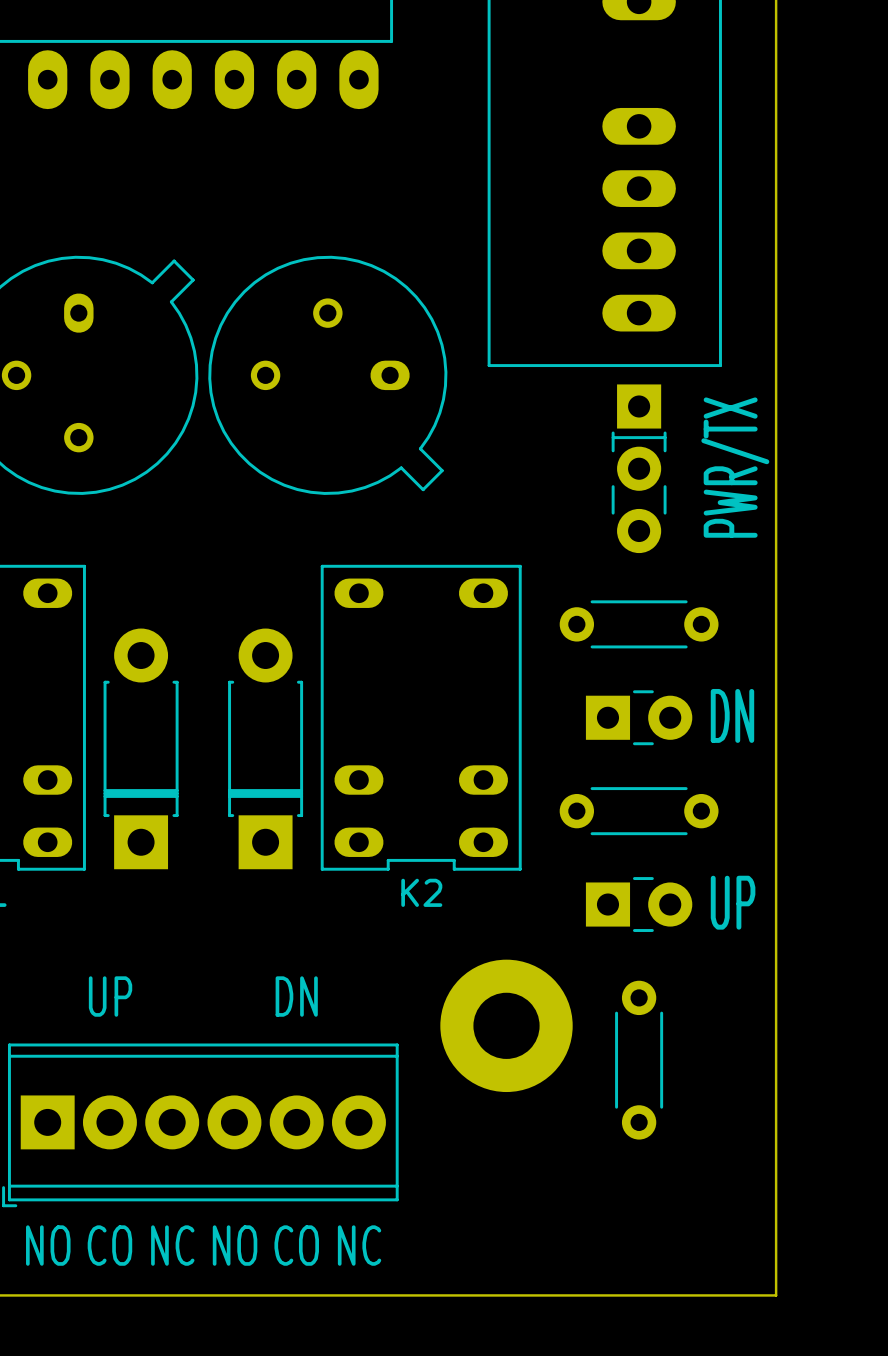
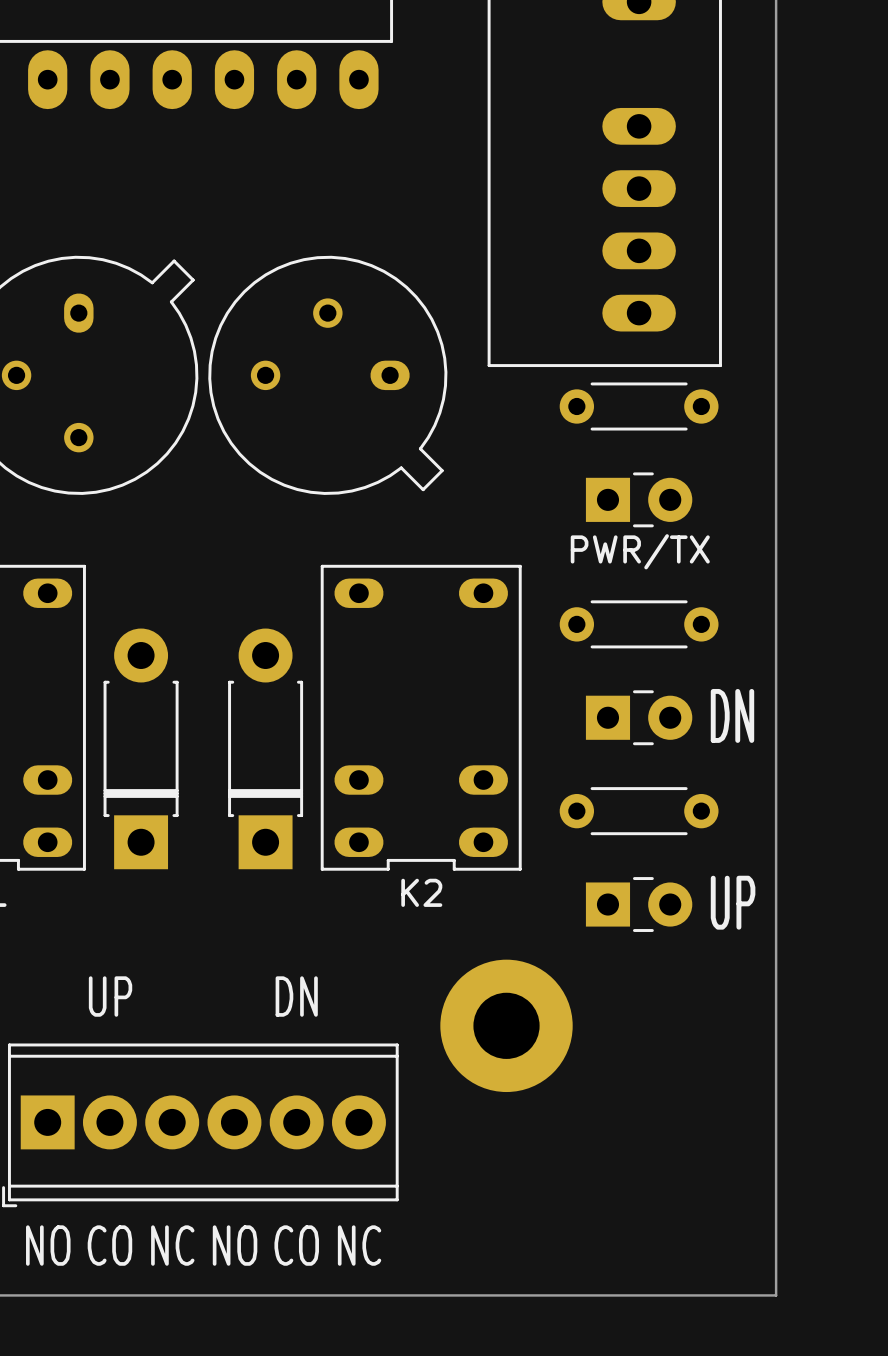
part: none -> (639, 406)
part: PWR/TX (639, 468) -> none
part: none -> PWR/TX (639, 499)
part: (639, 1060) -> none

